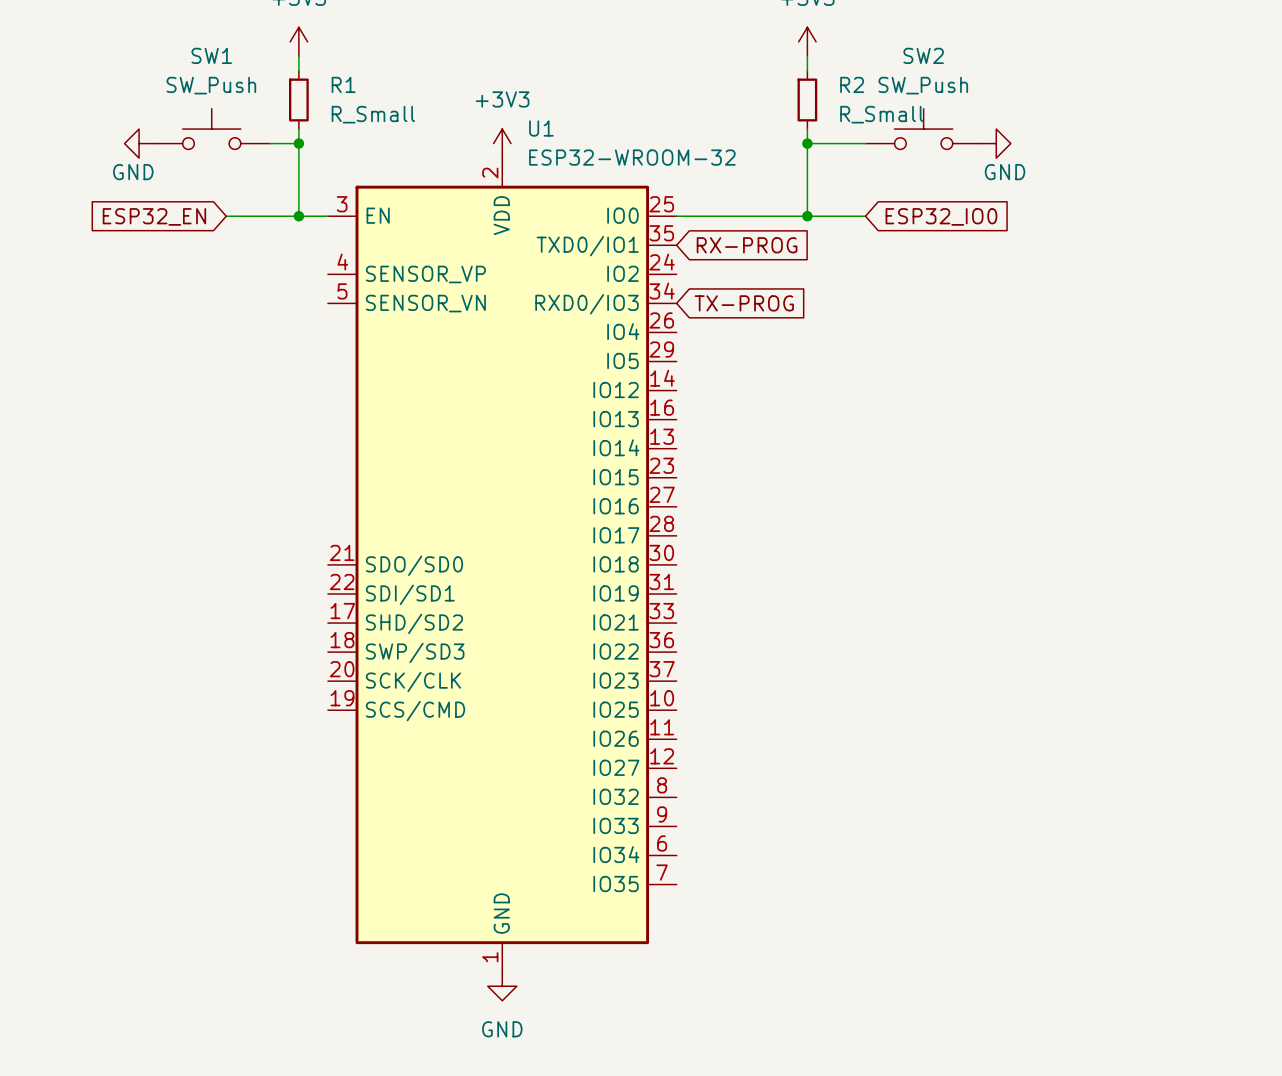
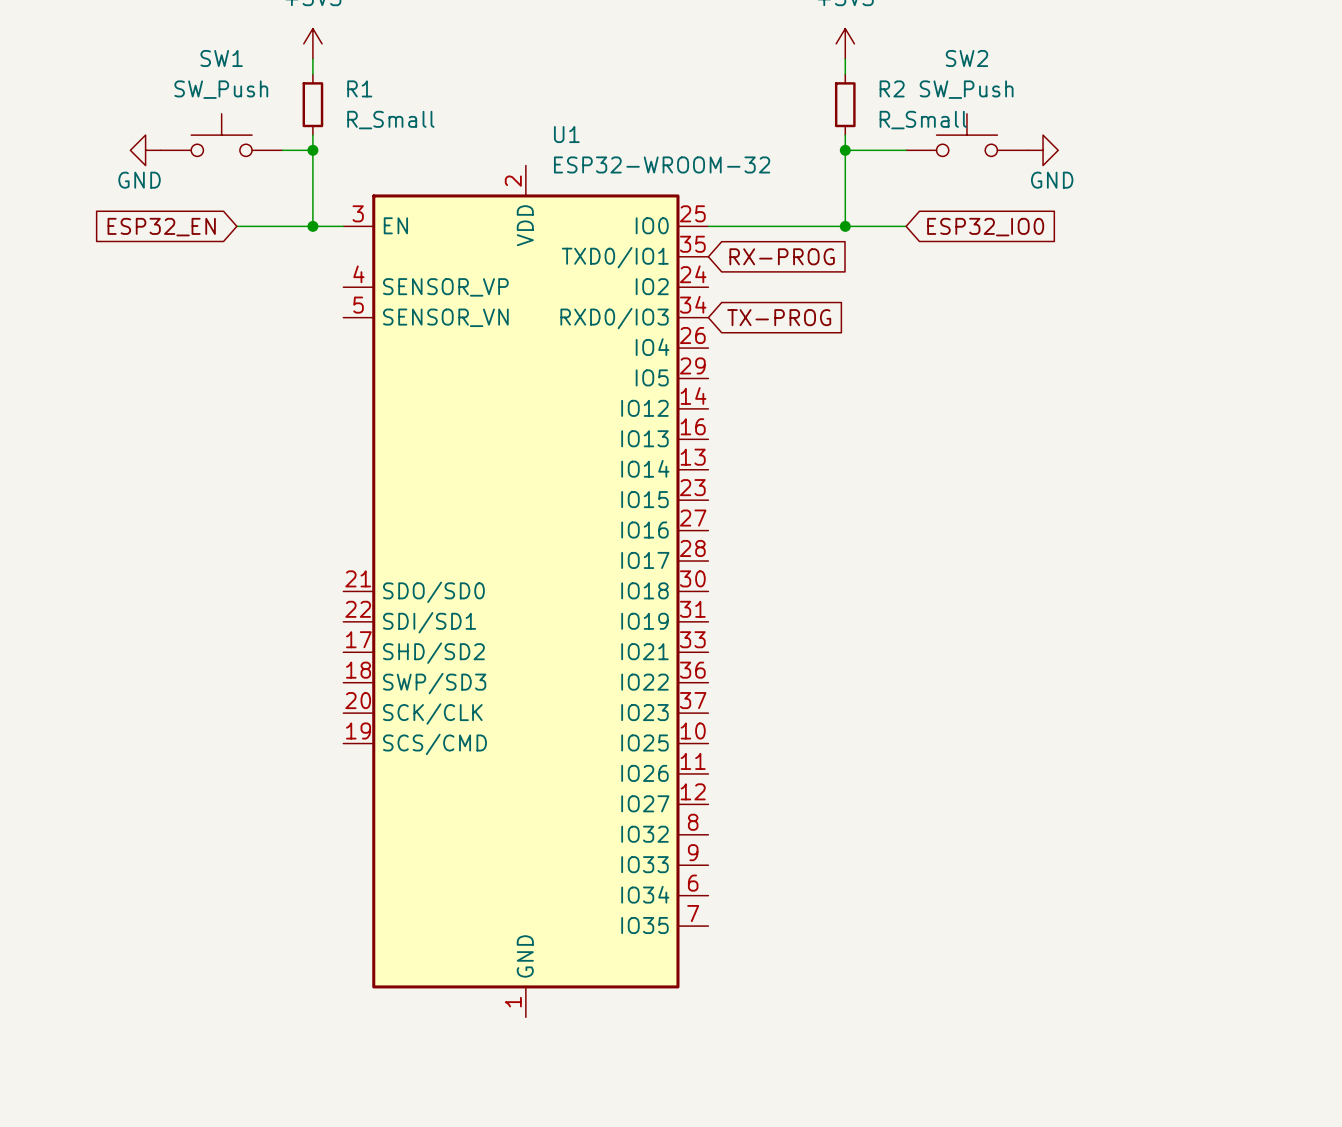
power symbol: +3V3 (502, 143) -> none
power symbol: GND (502, 986) -> none

